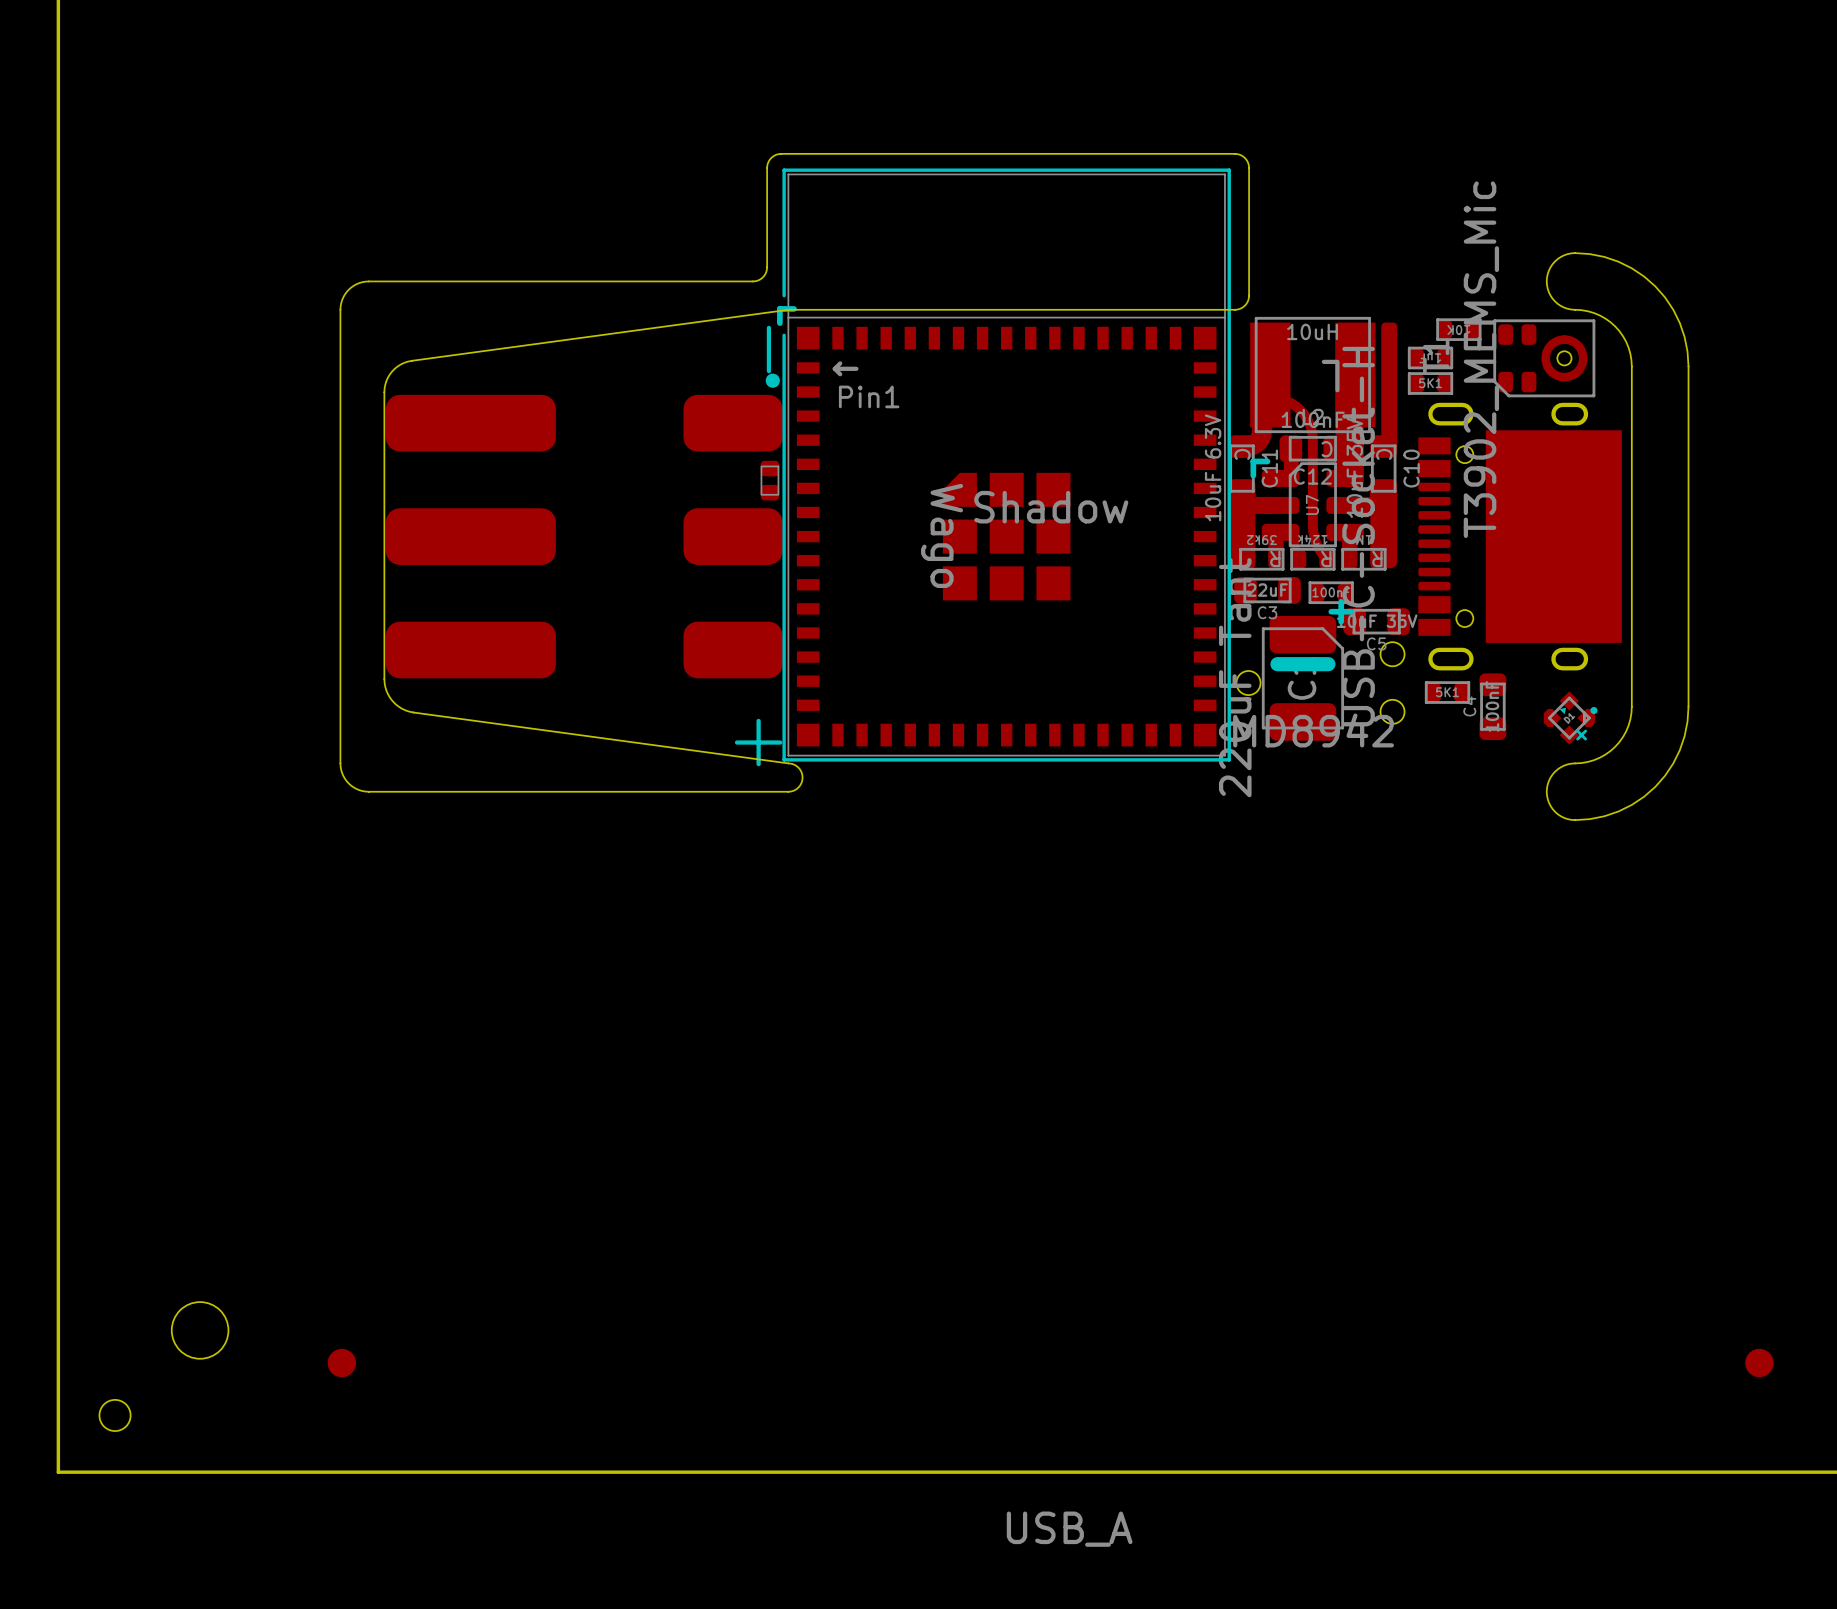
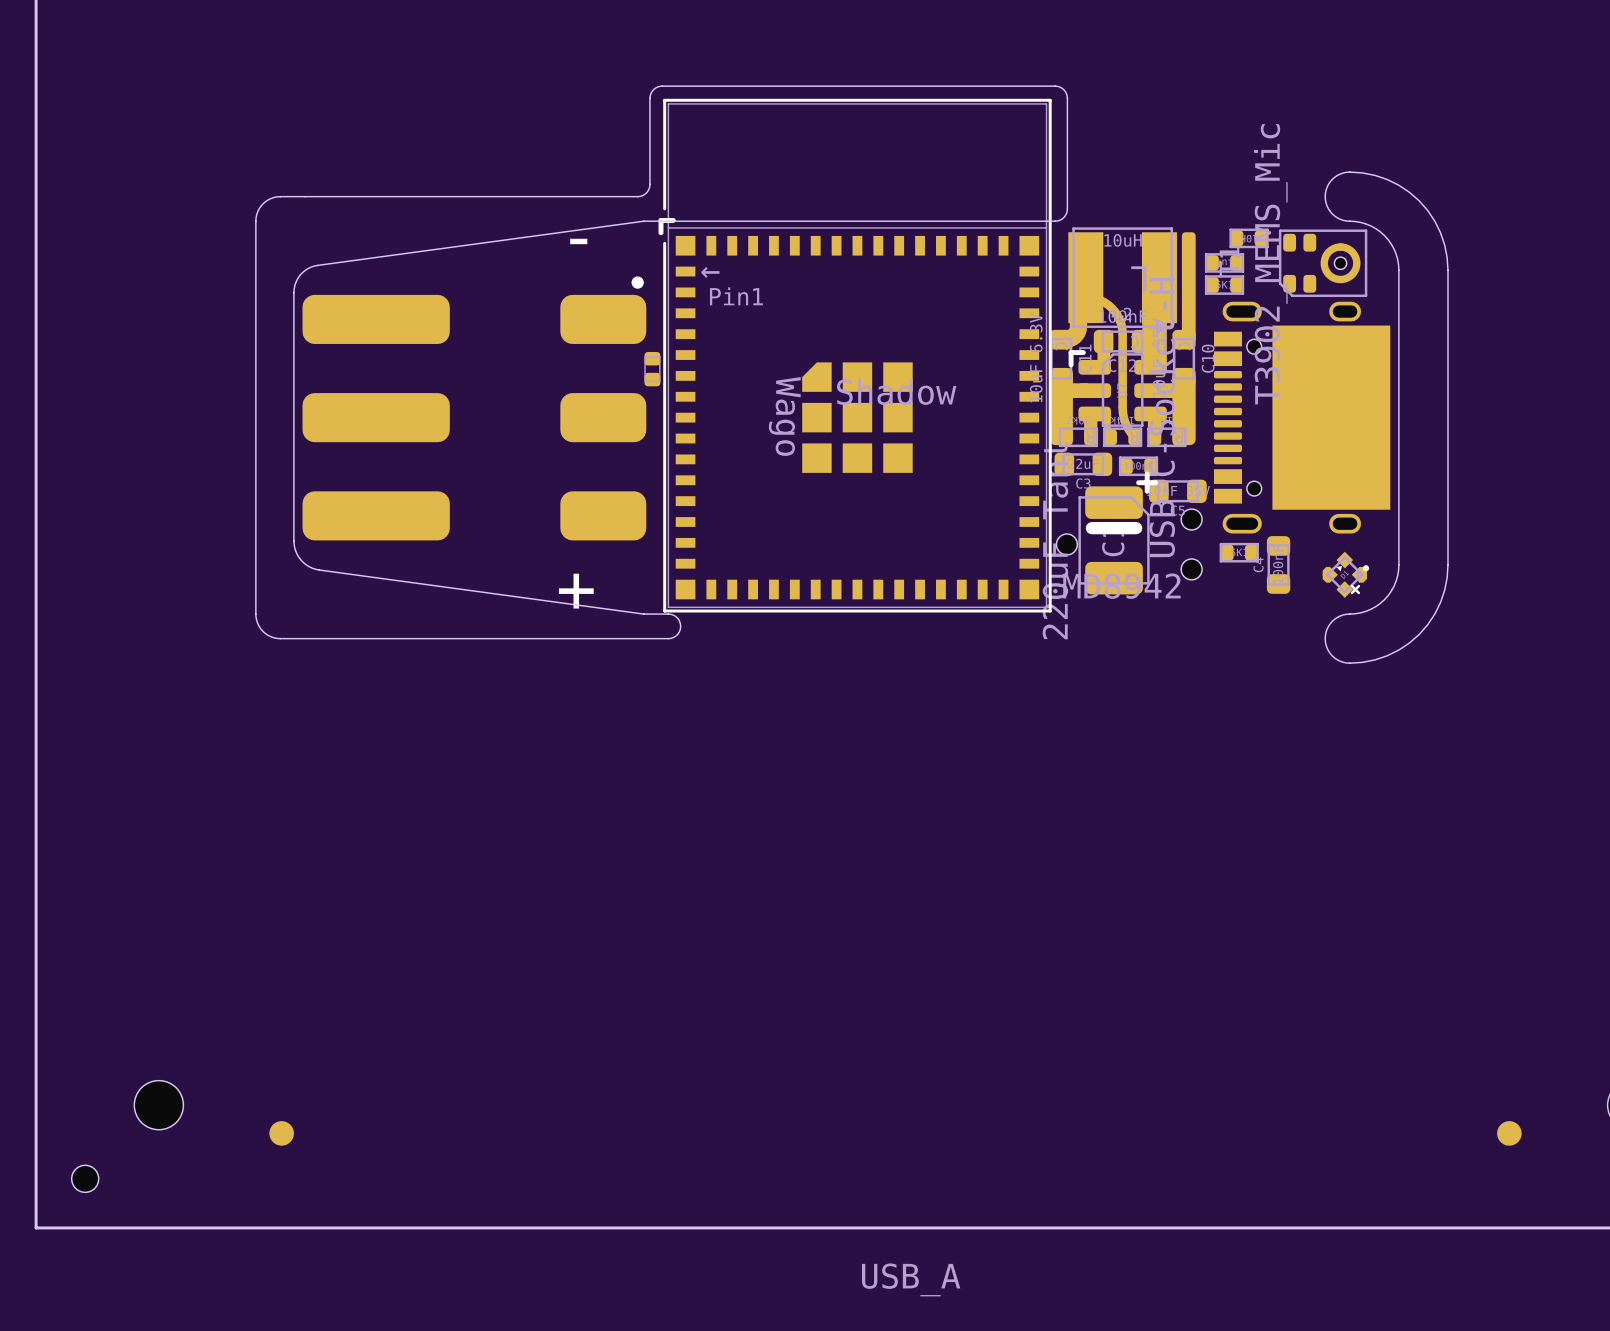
board edge: (368, 281) (356, 284) (348, 289) (342, 300) (340, 309) (340, 766) (343, 775) (351, 785) (359, 790) (368, 791) -> (304, 196) (277, 196) (269, 199) (259, 208) (255, 221) (256, 616) (261, 629) (269, 636) (277, 638) (304, 638)
board edge: (788, 309) (408, 361) (392, 371) (386, 381) (384, 392) (384, 679) (388, 694) (395, 704) (413, 712) (788, 763) -> (668, 221) (643, 221) (317, 265) (308, 268) (300, 274) (295, 282) (293, 292) (293, 540) (295, 551) (303, 562) (319, 570) (643, 614) (668, 614)
text rotation: 0° (768, 349) -> 90° counterclockwise (578, 241)
part position: (584, 525) -> (474, 408)
text position: + (758, 742) -> + (576, 591)

